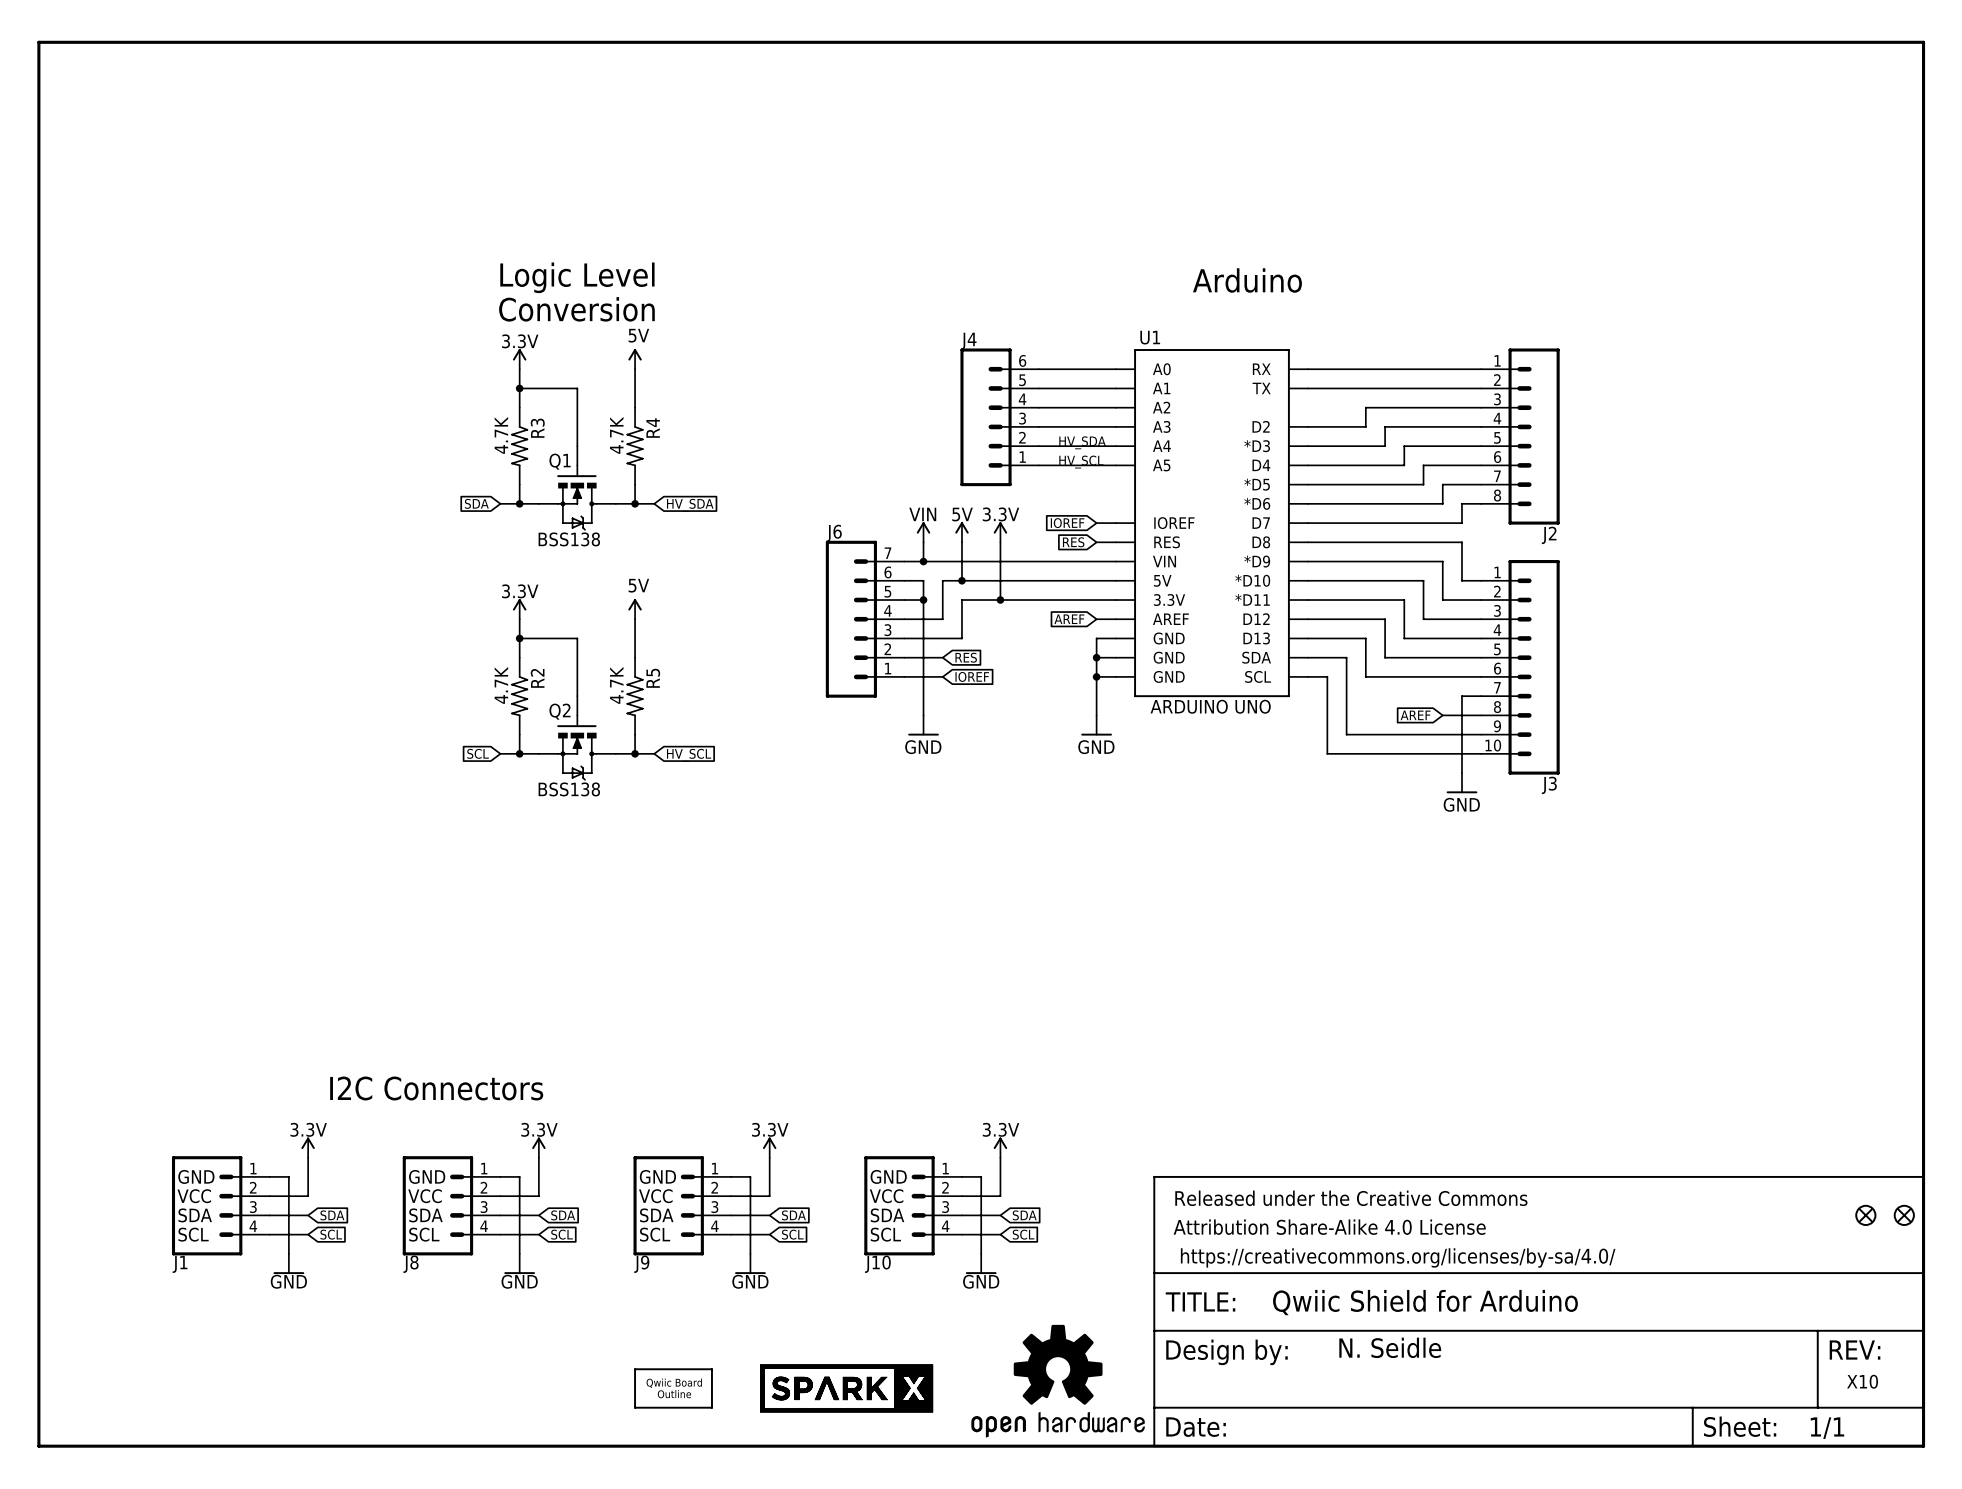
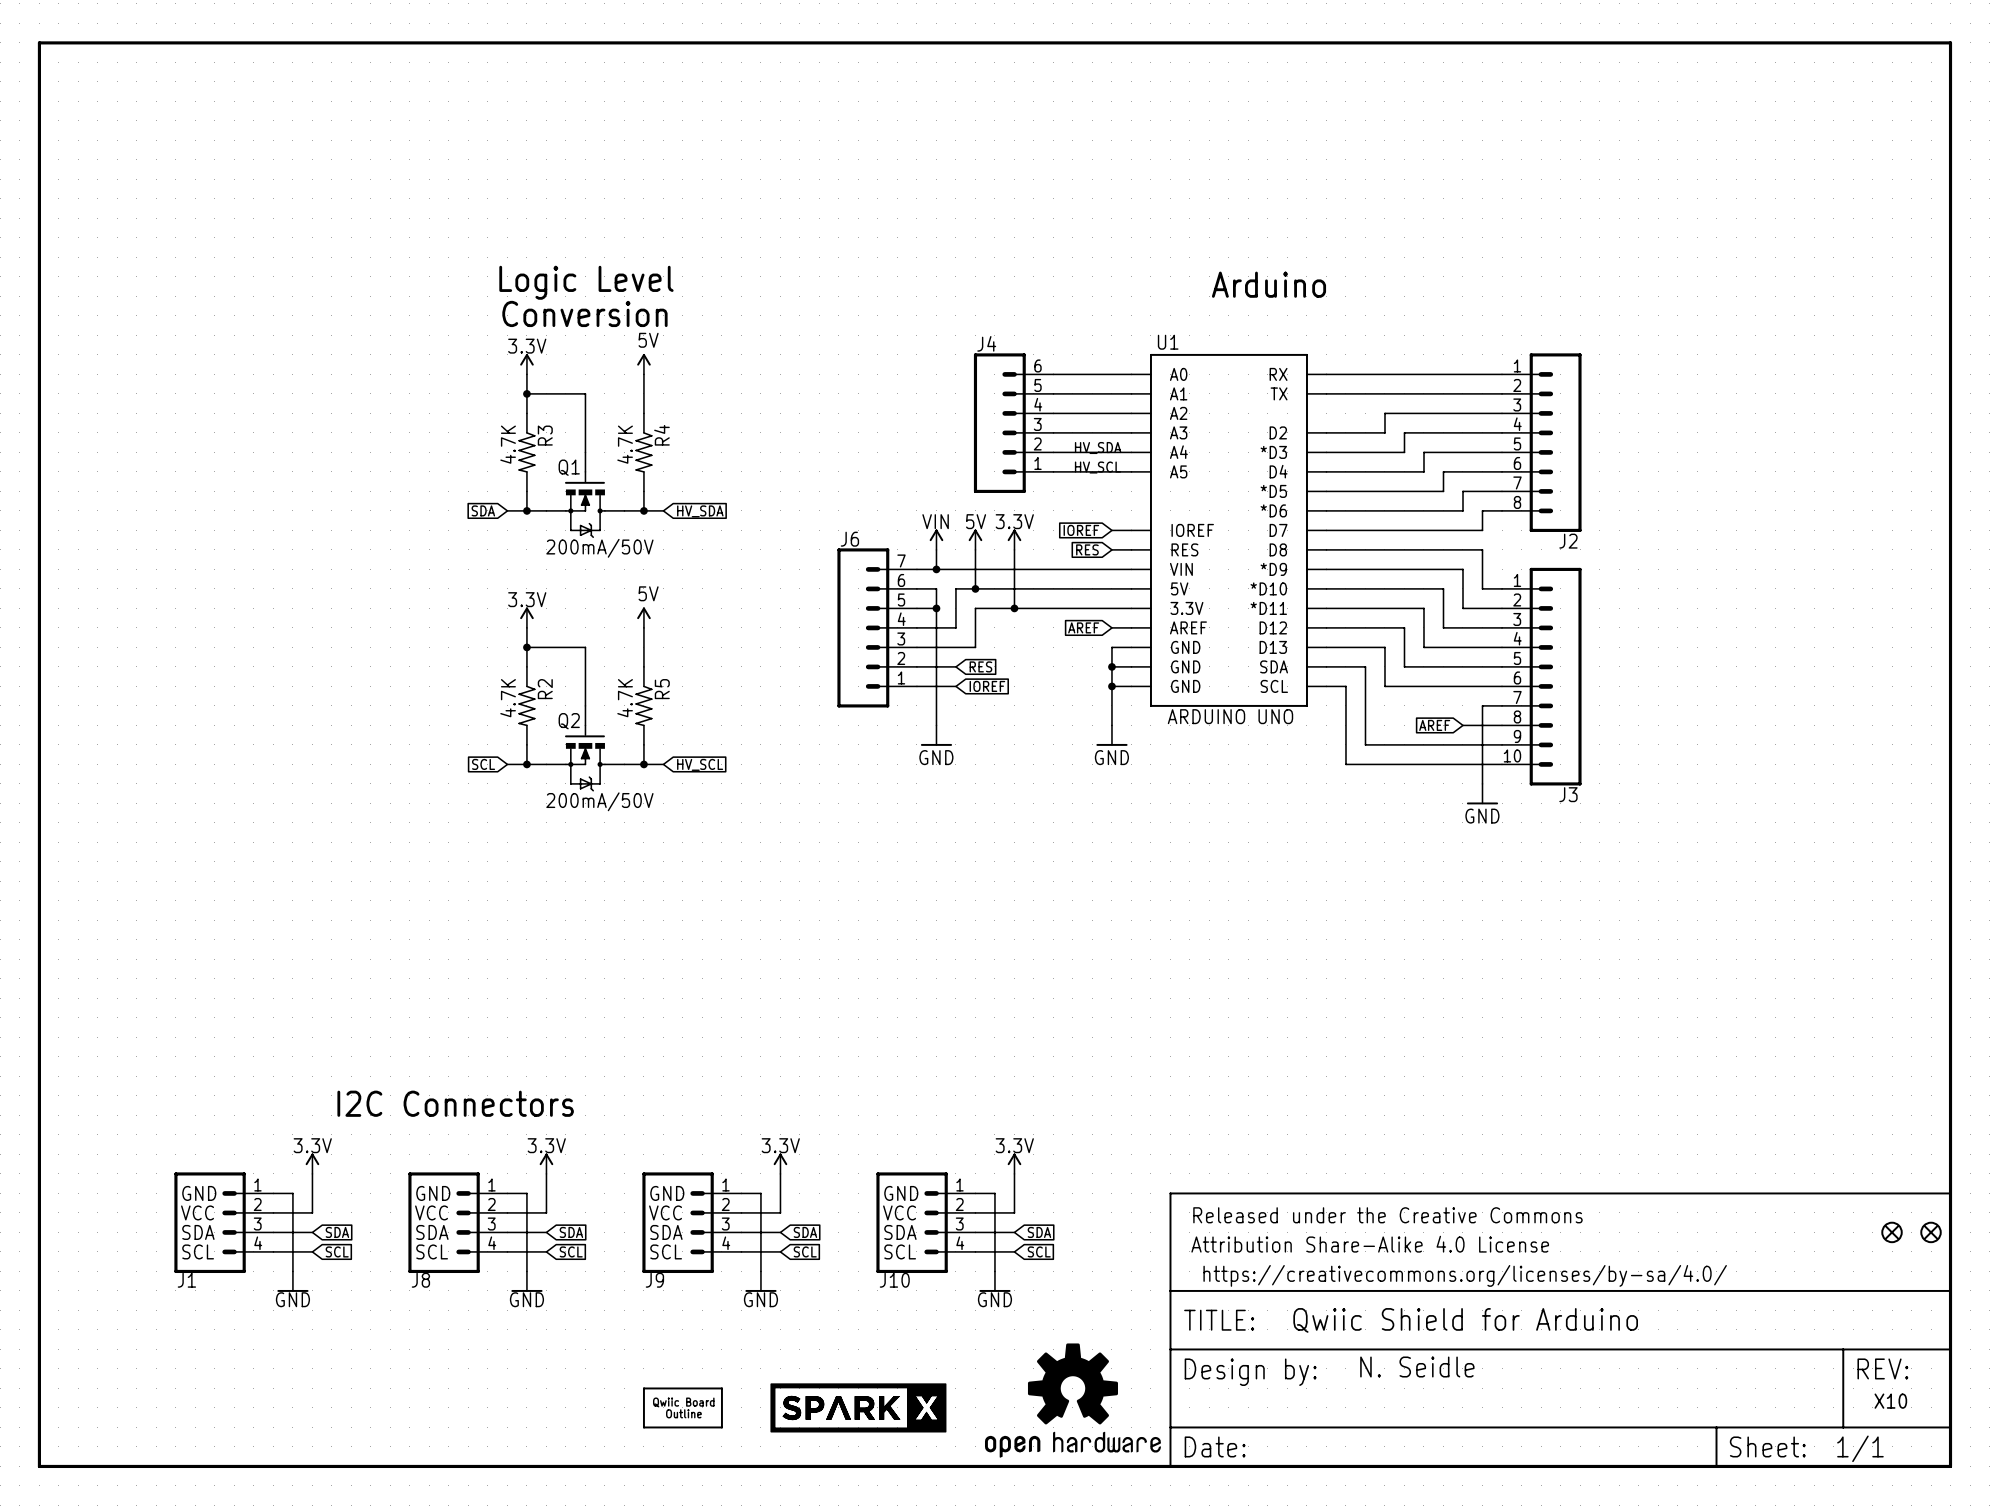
Q1 value: BSS138 (569, 539) -> 200mA/50V (599, 548)
Q2 value: BSS138 (569, 789) -> 200mA/50V (599, 801)

